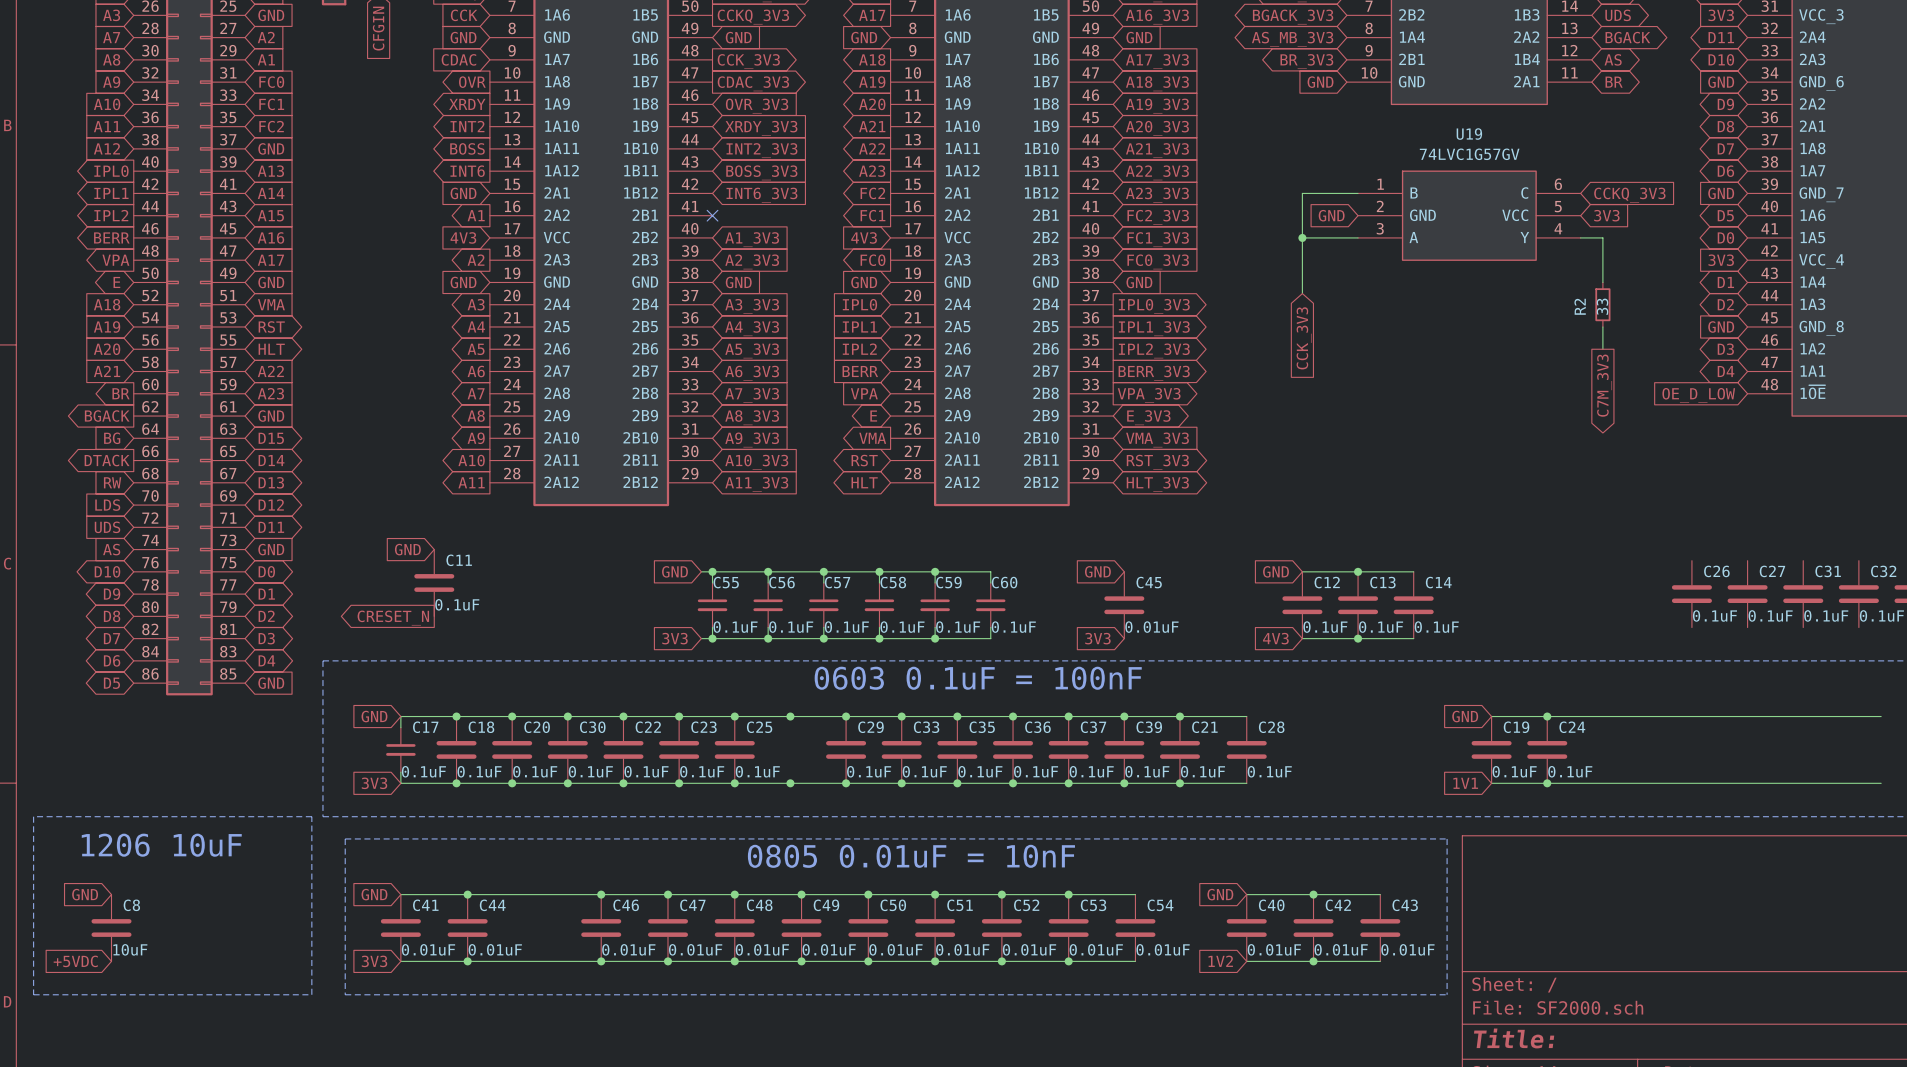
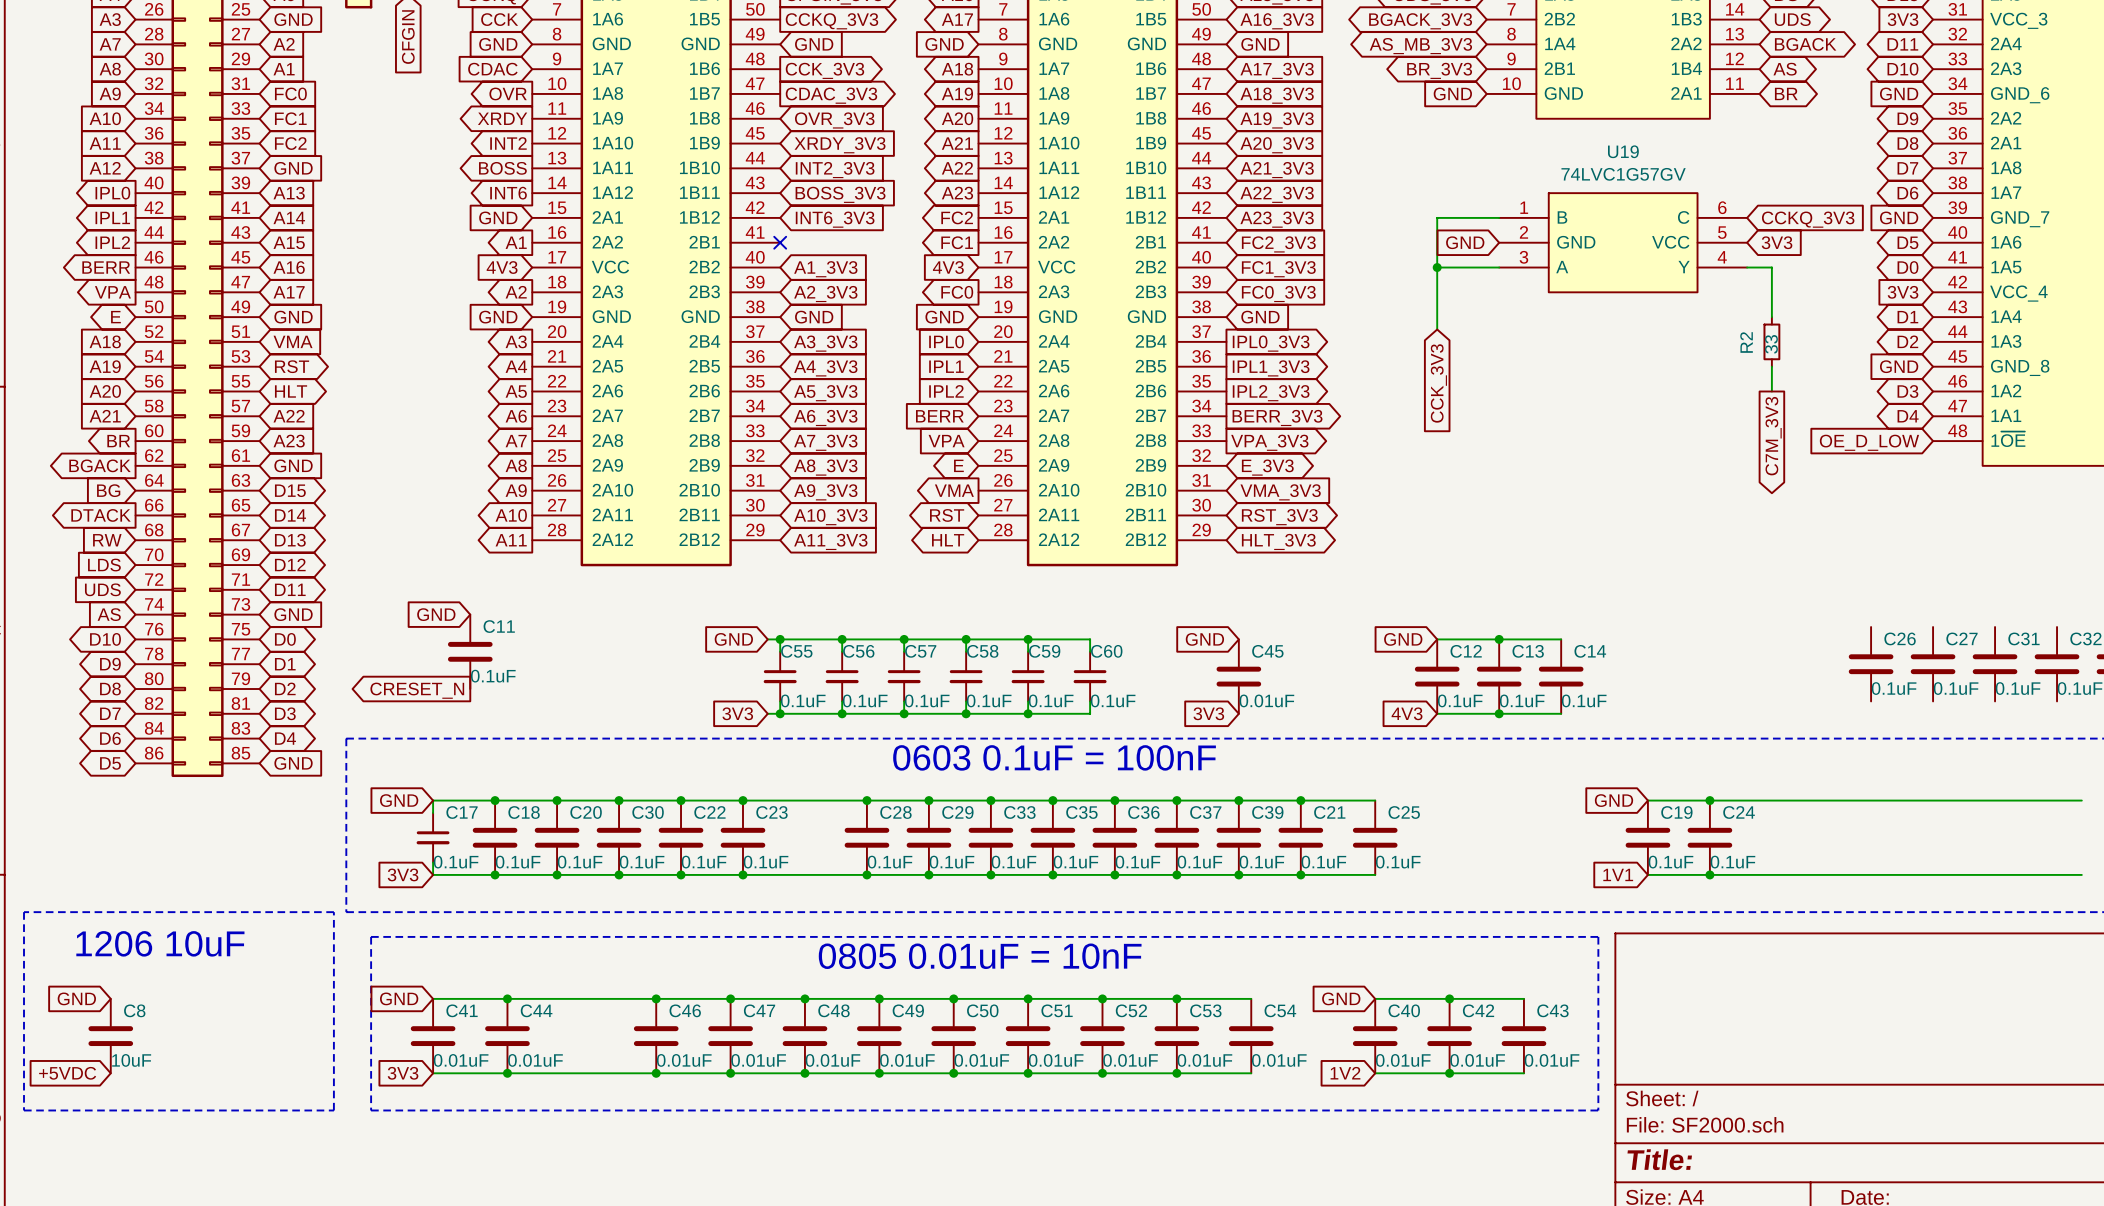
junction: (734, 716) -> none
C28 name: C28 (1271, 727) -> C25 (1404, 812)
C25: 0.1uF (734, 749) -> none
C28: none -> 0.1uF (866, 837)
junction: (734, 783) -> none

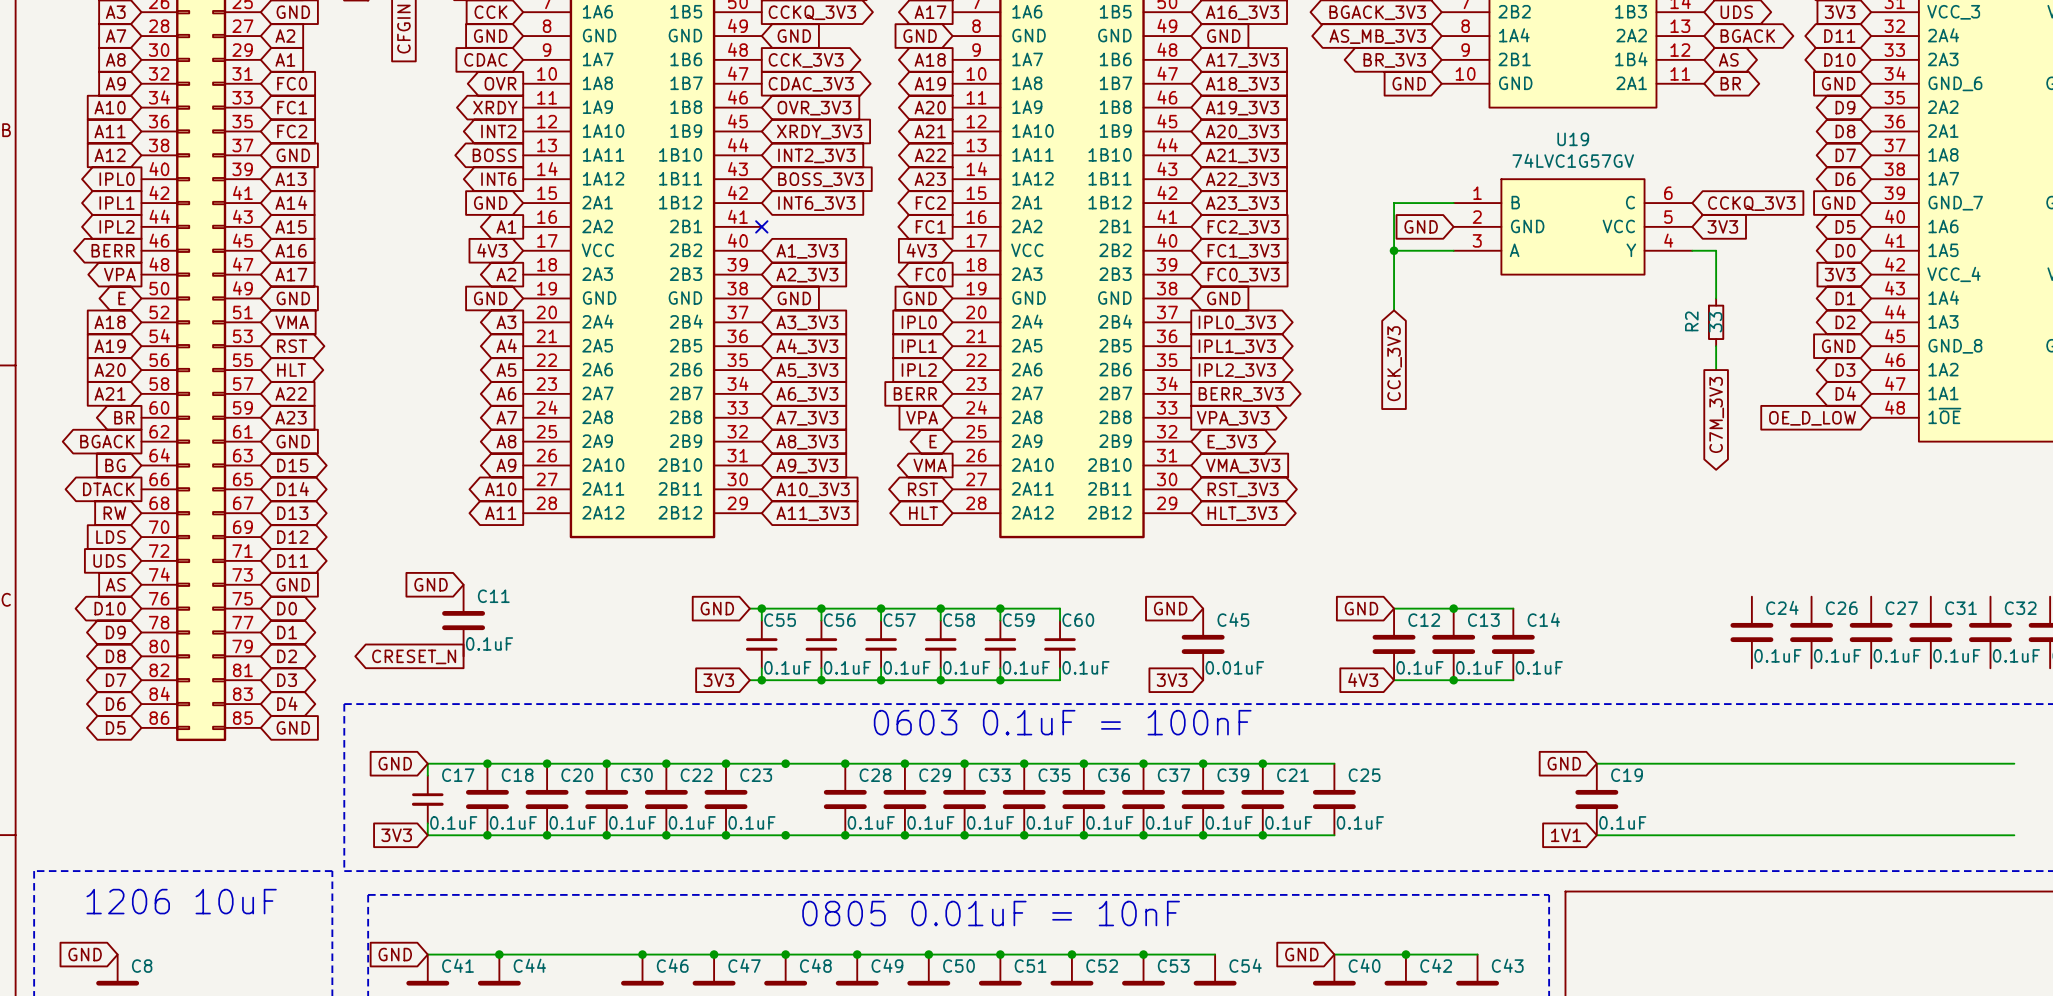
junction: none -> (785, 763)
junction: (1709, 800) -> none
C24 position: (1709, 837) -> (1751, 632)
junction: none -> (785, 835)
junction: (1709, 874) -> none

